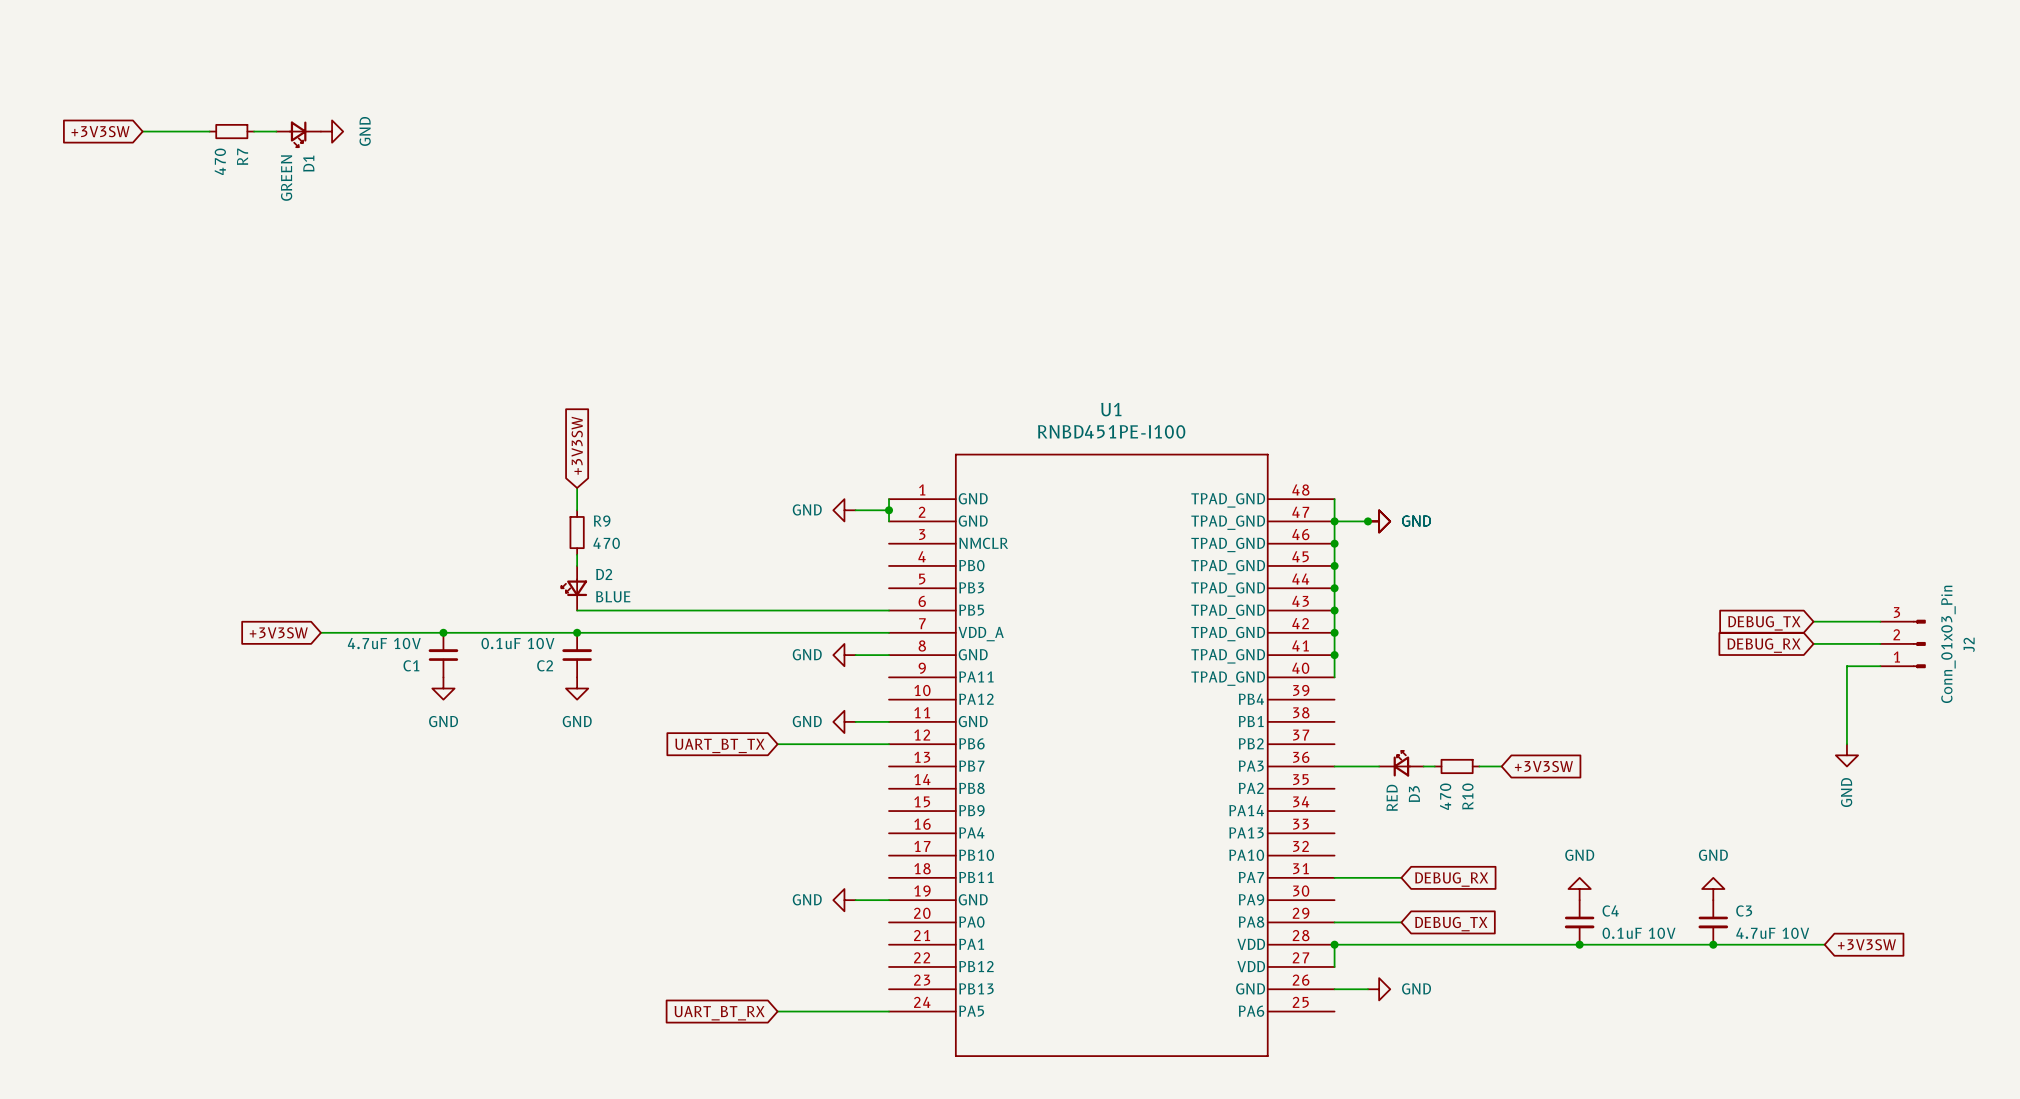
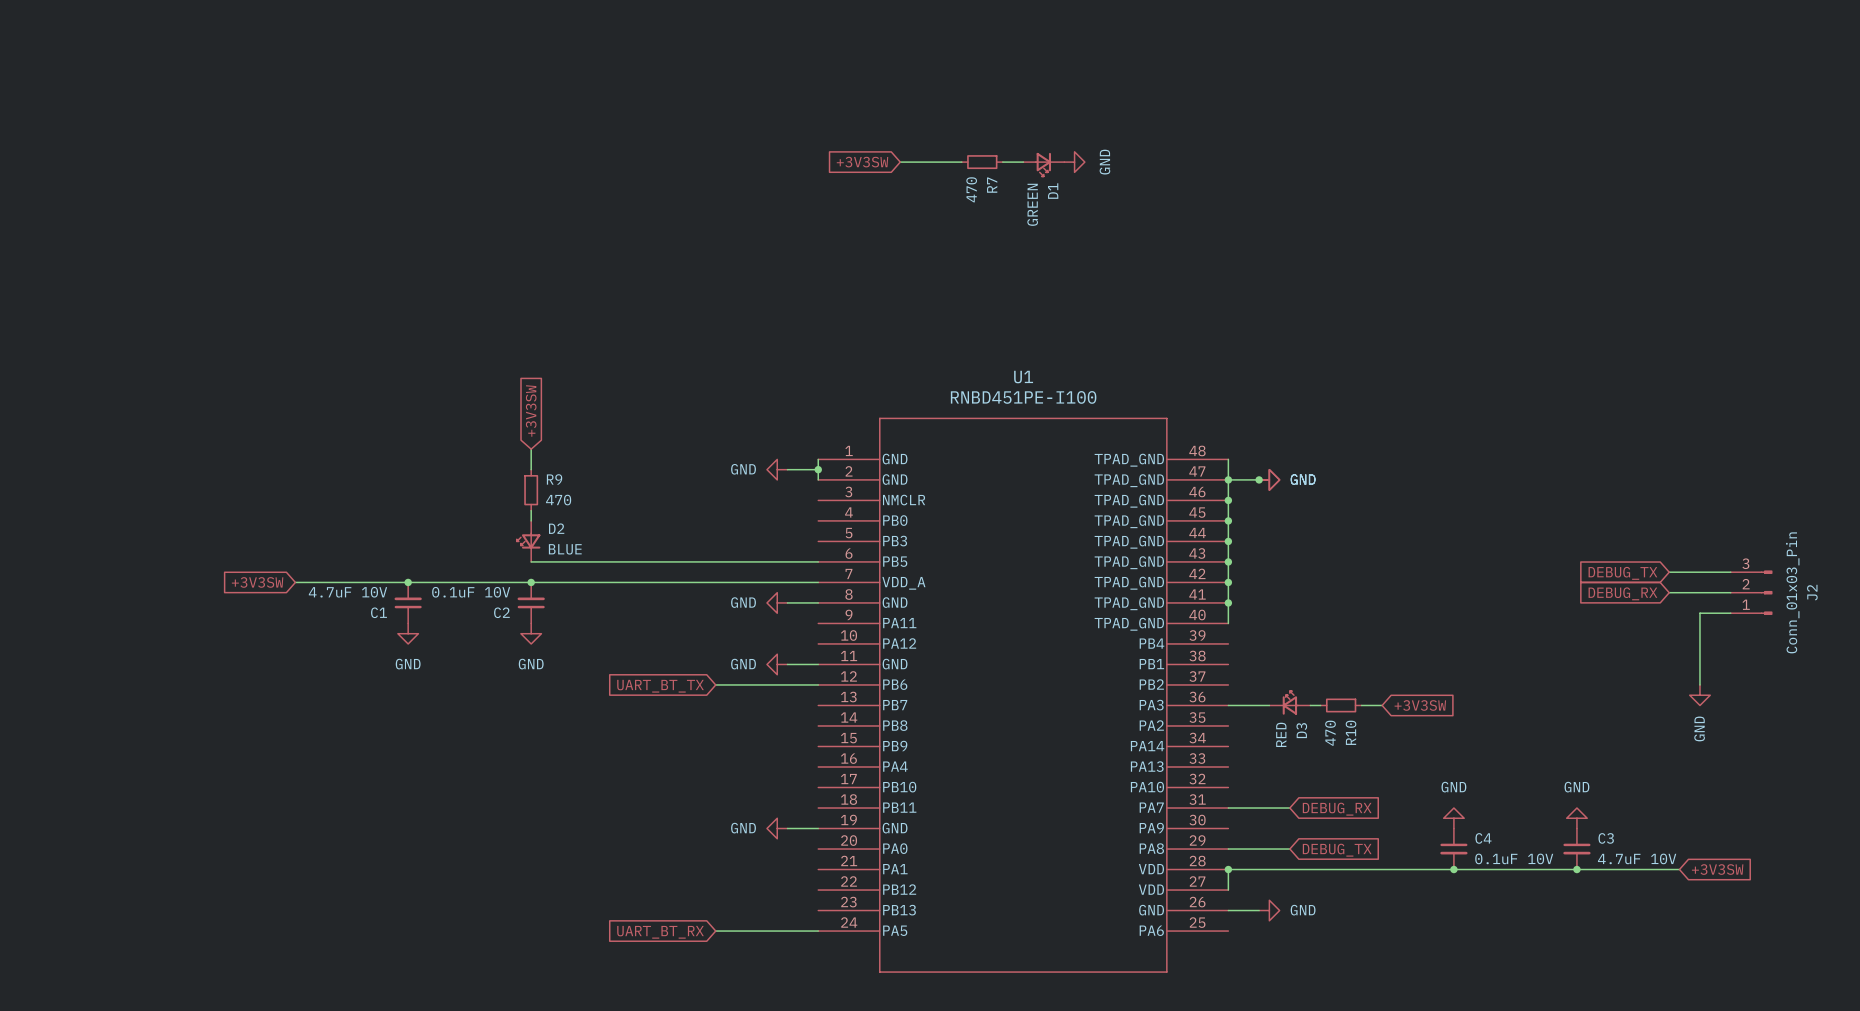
global label: +3V3SW (100, 131) -> none
wire: (142, 131) (209, 131) -> none
R7 position: (231, 131) -> (982, 162)
wire: (254, 131) (276, 131) -> none
power symbol: GND (332, 131) -> none
D1 position: (298, 134) -> (1043, 164)
global label: none -> +3V3SW (862, 162)
wire: none -> (900, 162) (961, 162)
wire: none -> (1002, 162) (1023, 162)
power symbol: none -> GND (1074, 162)

